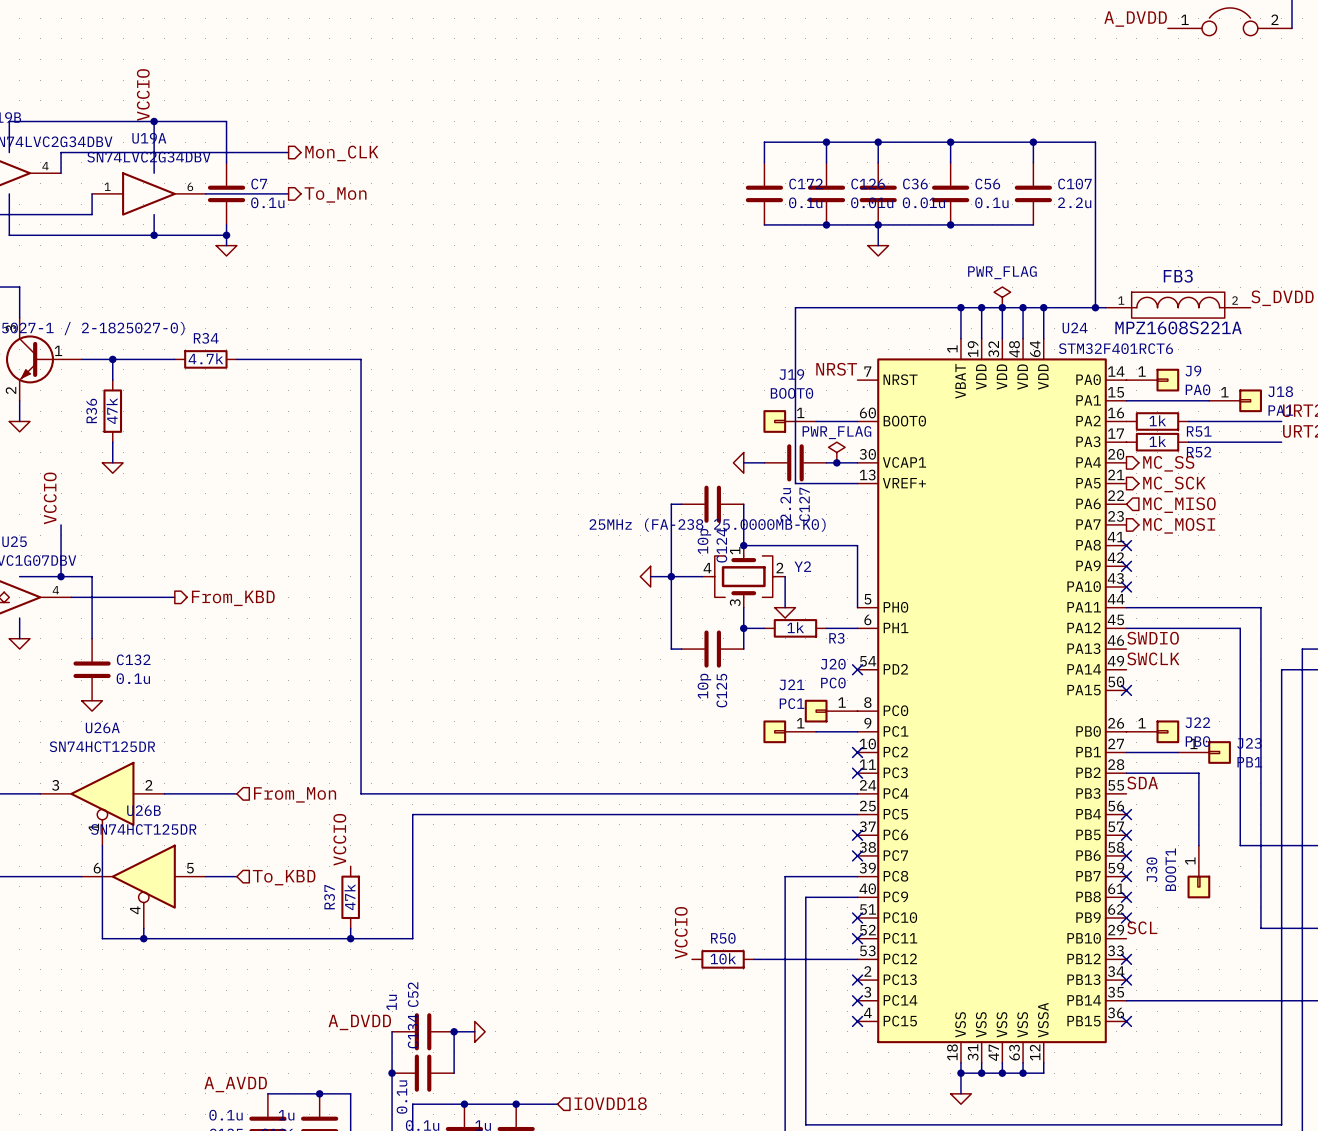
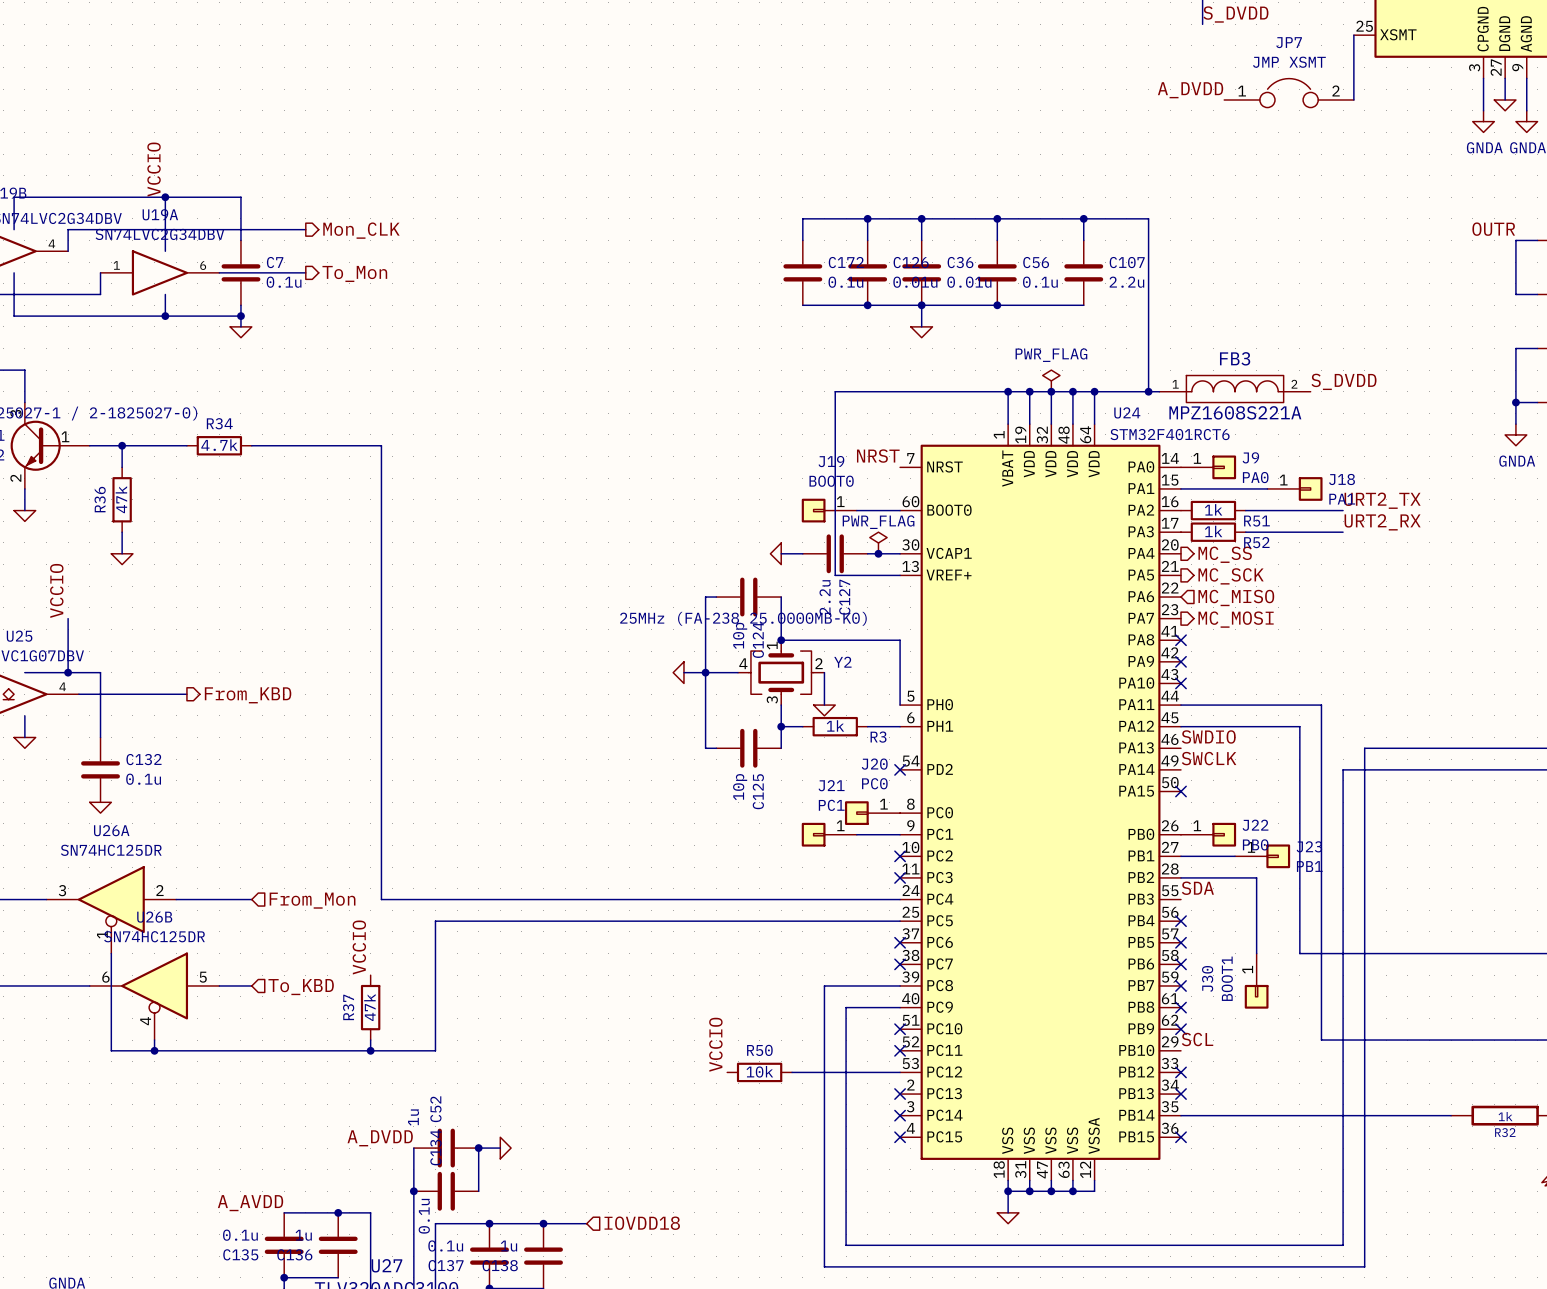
U26A value: SN74HCT125DR (102, 746) -> SN74HC125DR (111, 850)
U26B value: SN74HCT125DR (143, 829) -> SN74HC125DR (154, 936)

